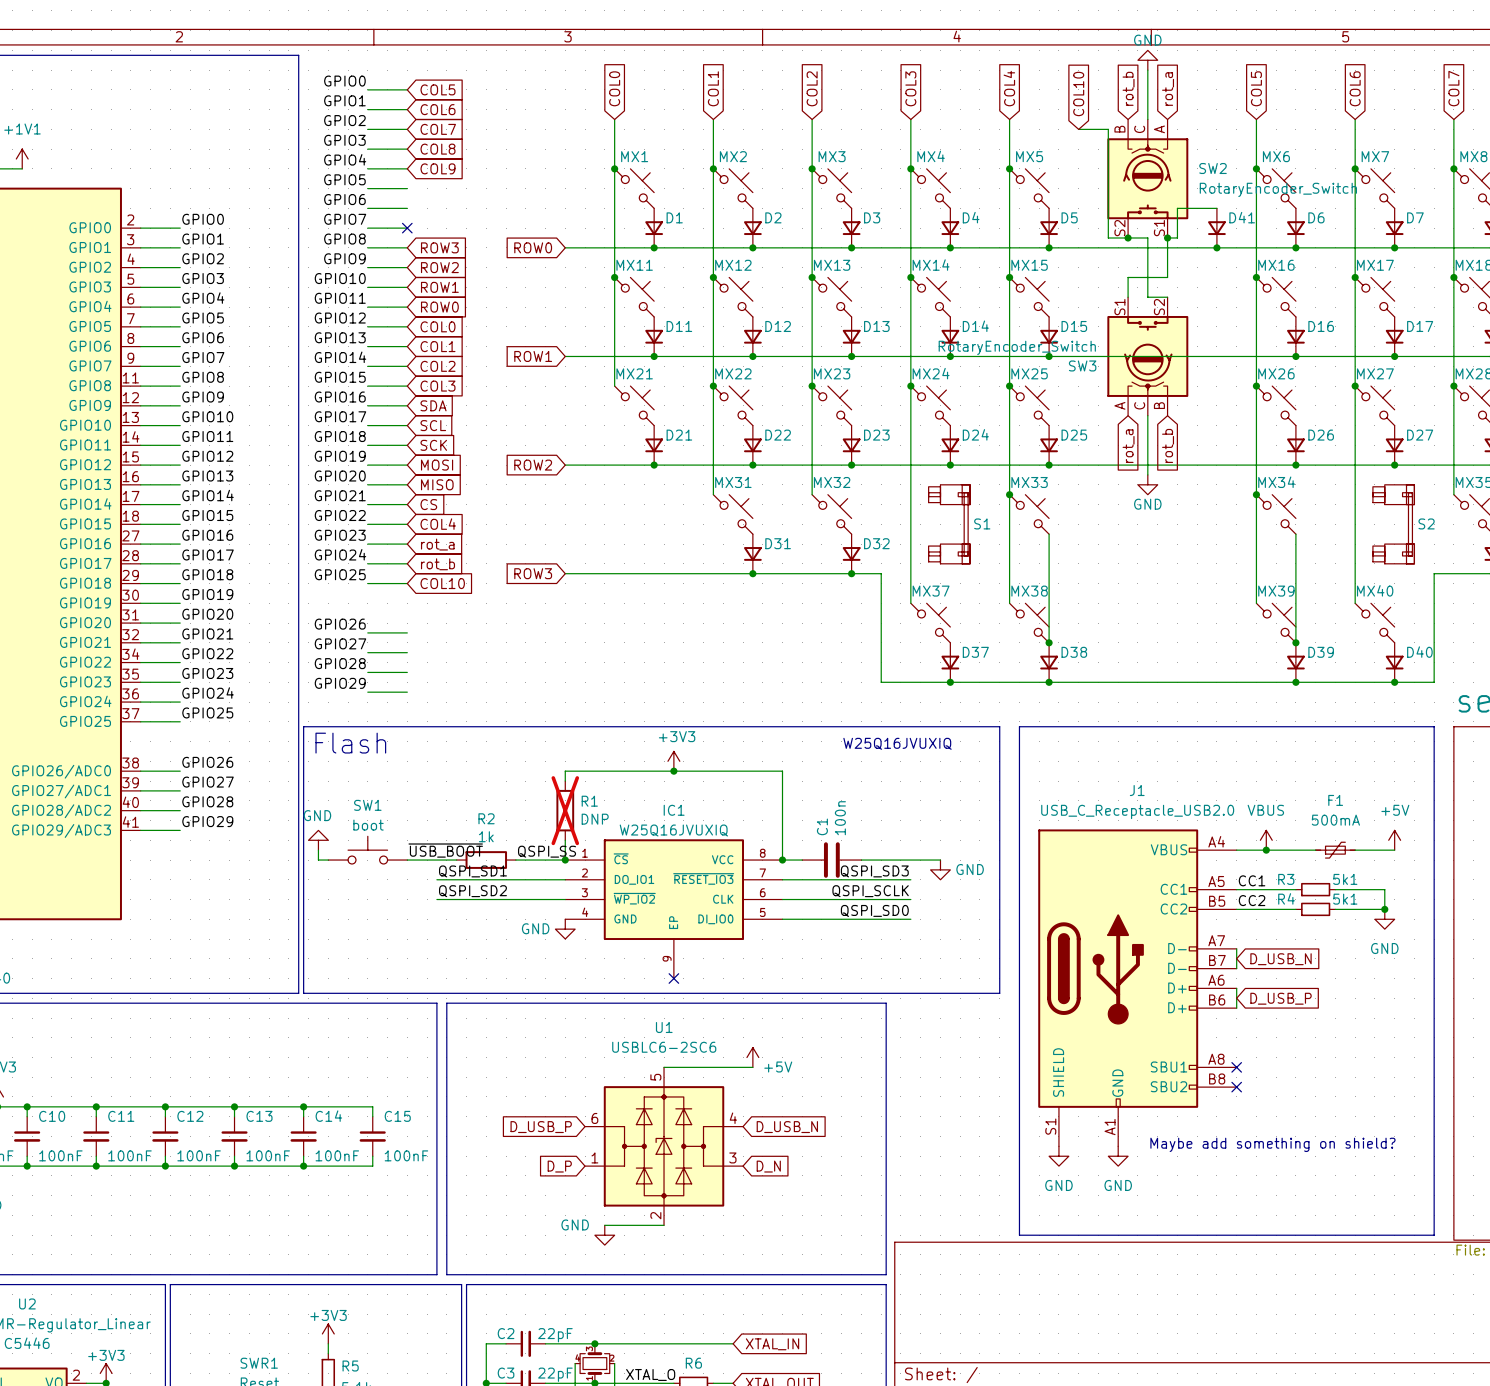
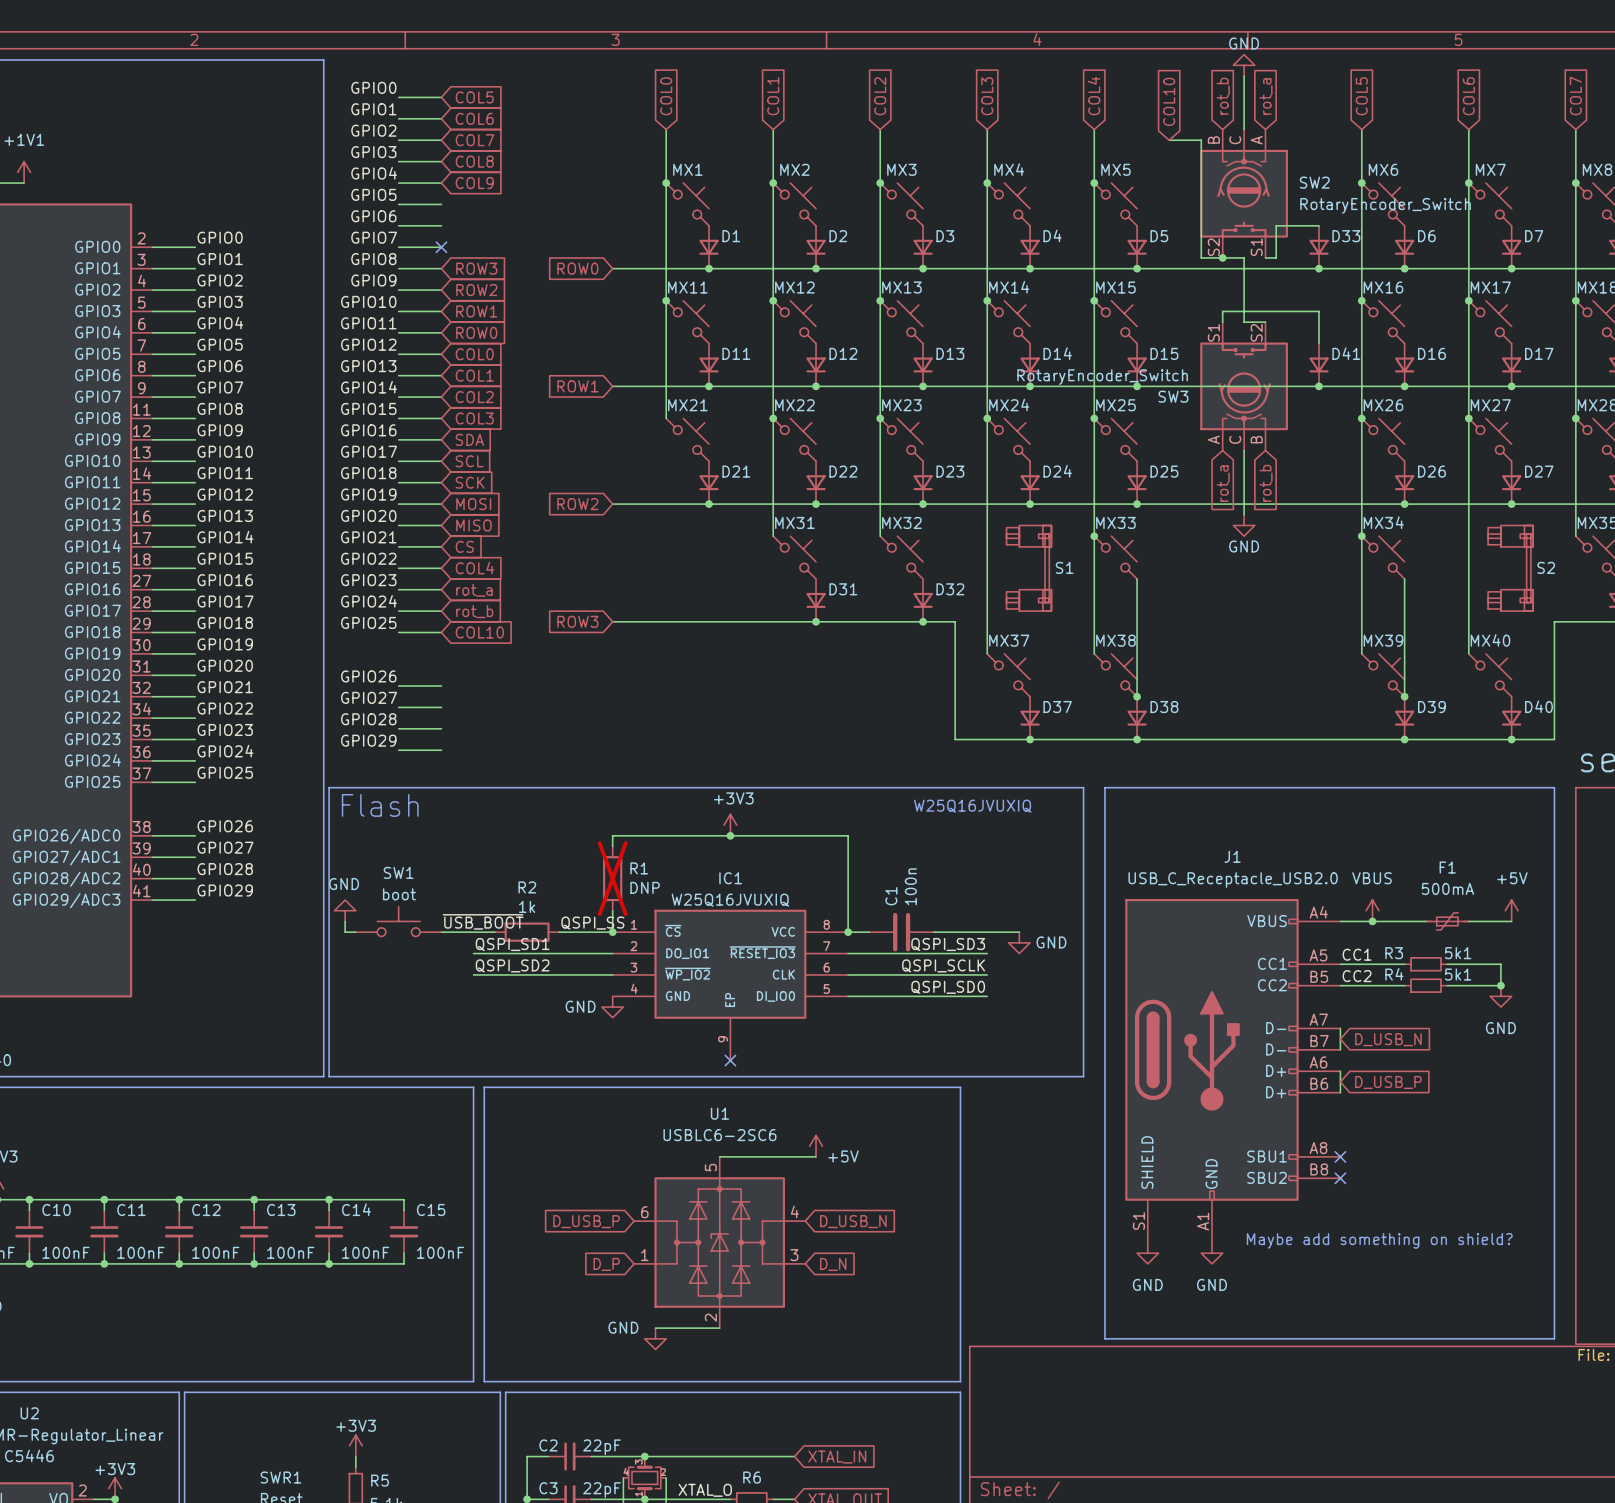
D41 name: D41 (1242, 217) -> D33 (1346, 236)
wire: (1167, 237) (1167, 277) (1128, 277) (1128, 287) -> (1319, 343) (1319, 311) (1222, 311)
junction: (1167, 237) -> none
D41: none -> (1319, 364)
junction: none -> (1319, 386)

